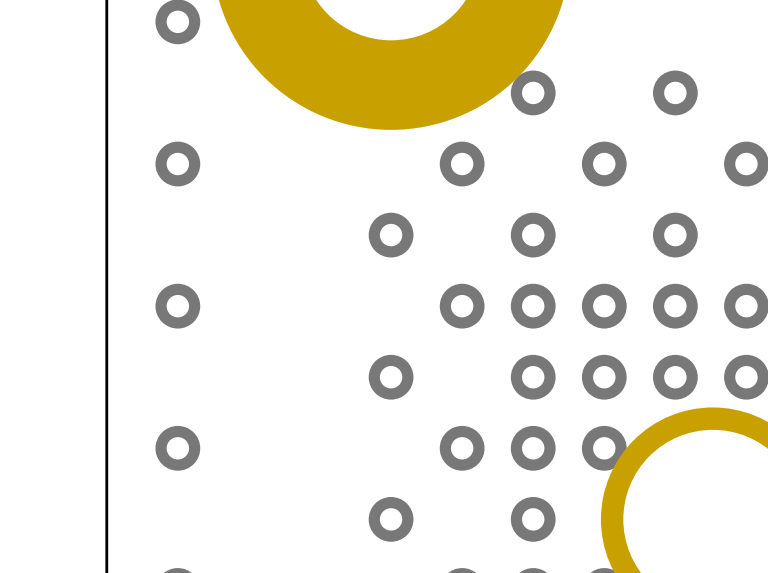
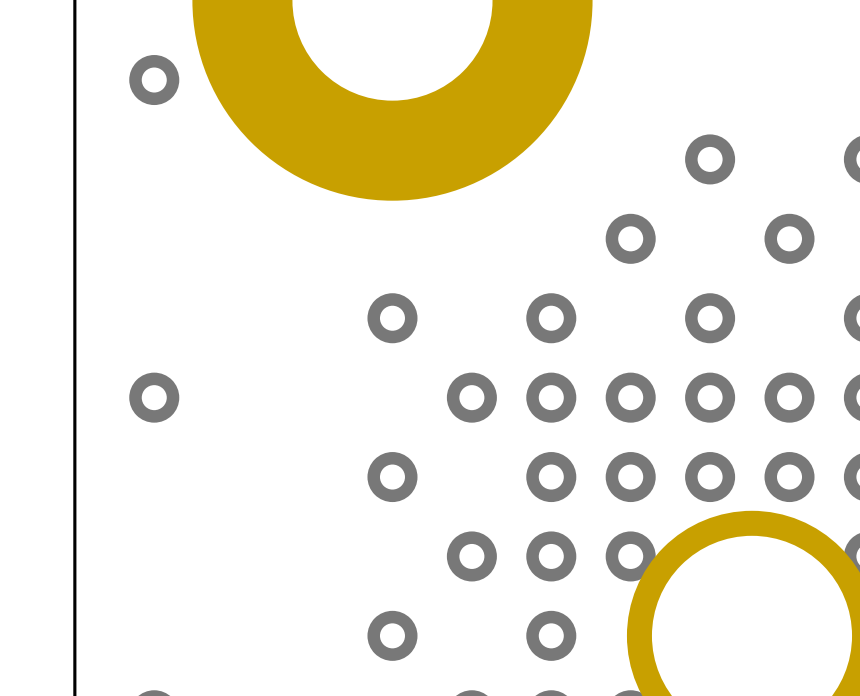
via: (533, 92) -> none
via: (177, 164) -> none
via: (462, 164) -> none
via: (177, 448) -> none

